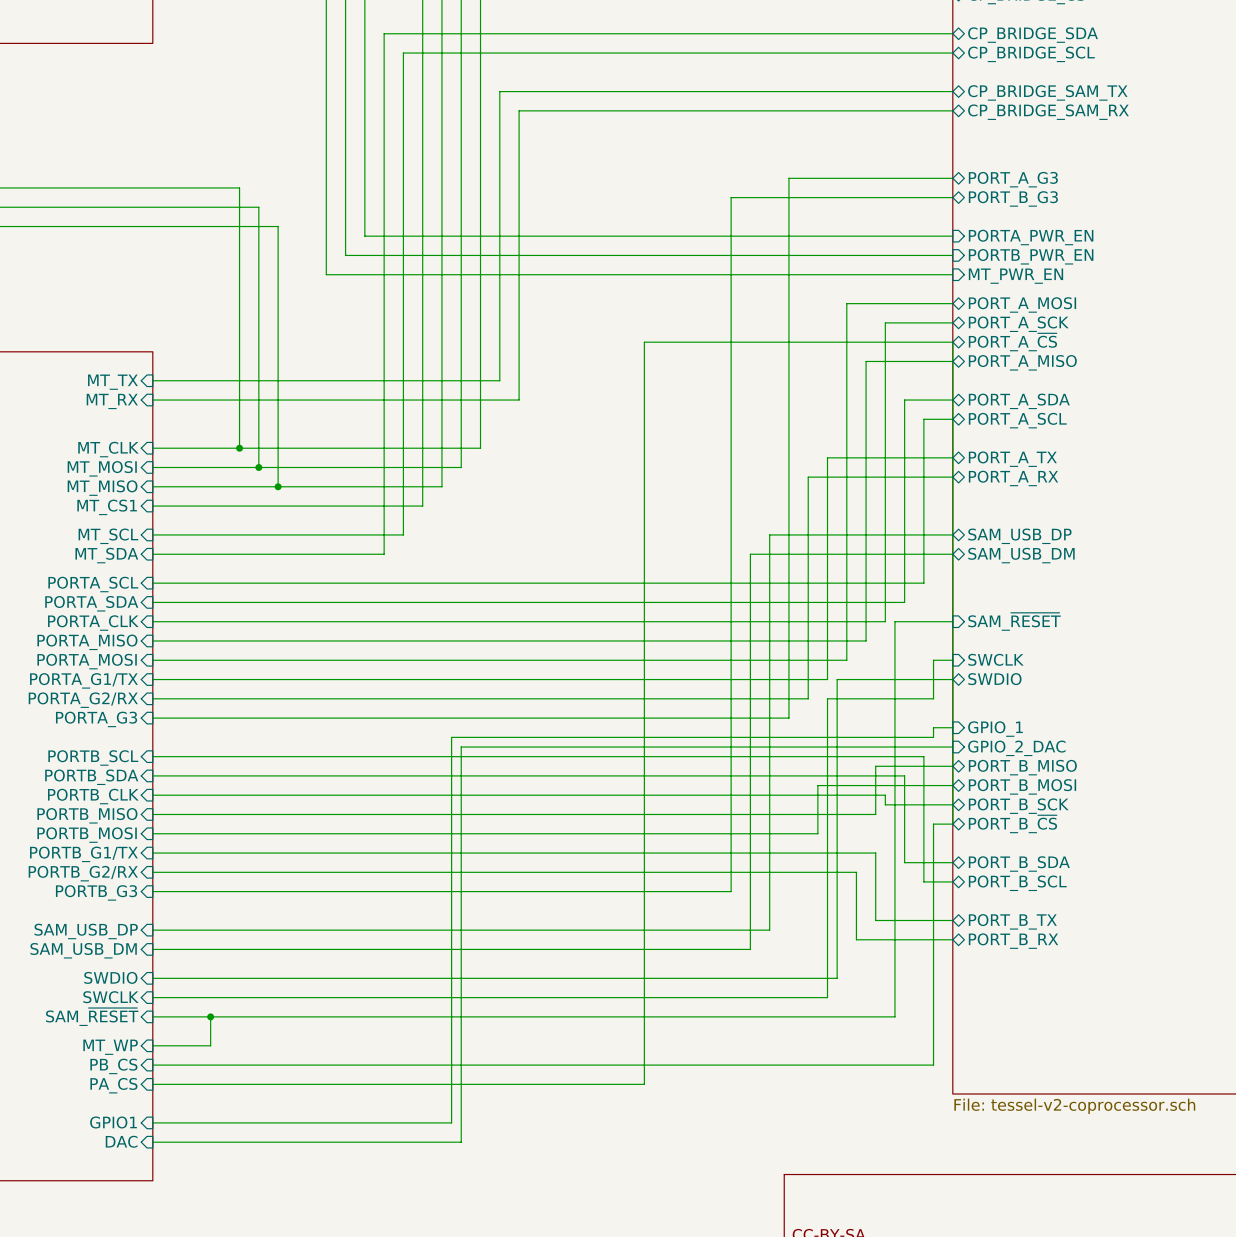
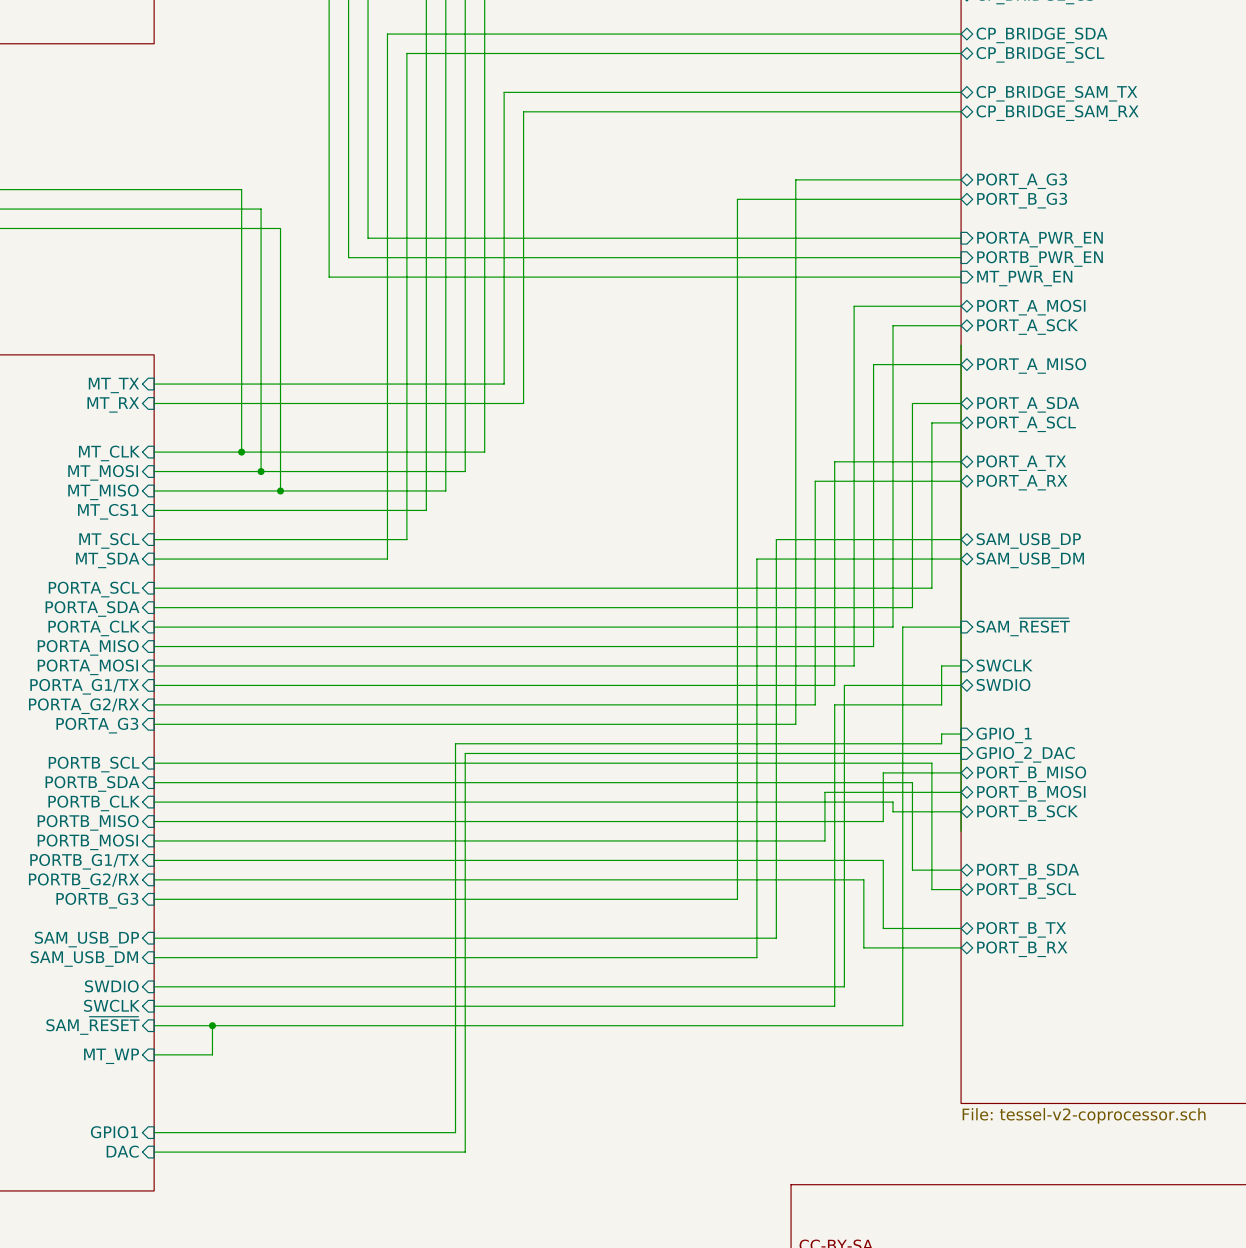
wire: (952, 342) (644, 342) (644, 1084) (152, 1084) -> none
sheet pin: PORT_A_~{CS} (1012, 342) -> none
wire: (952, 824) (933, 824) (933, 1065) (152, 1065) -> none
sheet pin: PORT_B_~{CS} (1012, 824) -> none
sheet pin: PB_CS (113, 1066) -> none
sheet pin: PA_CS (113, 1085) -> none

